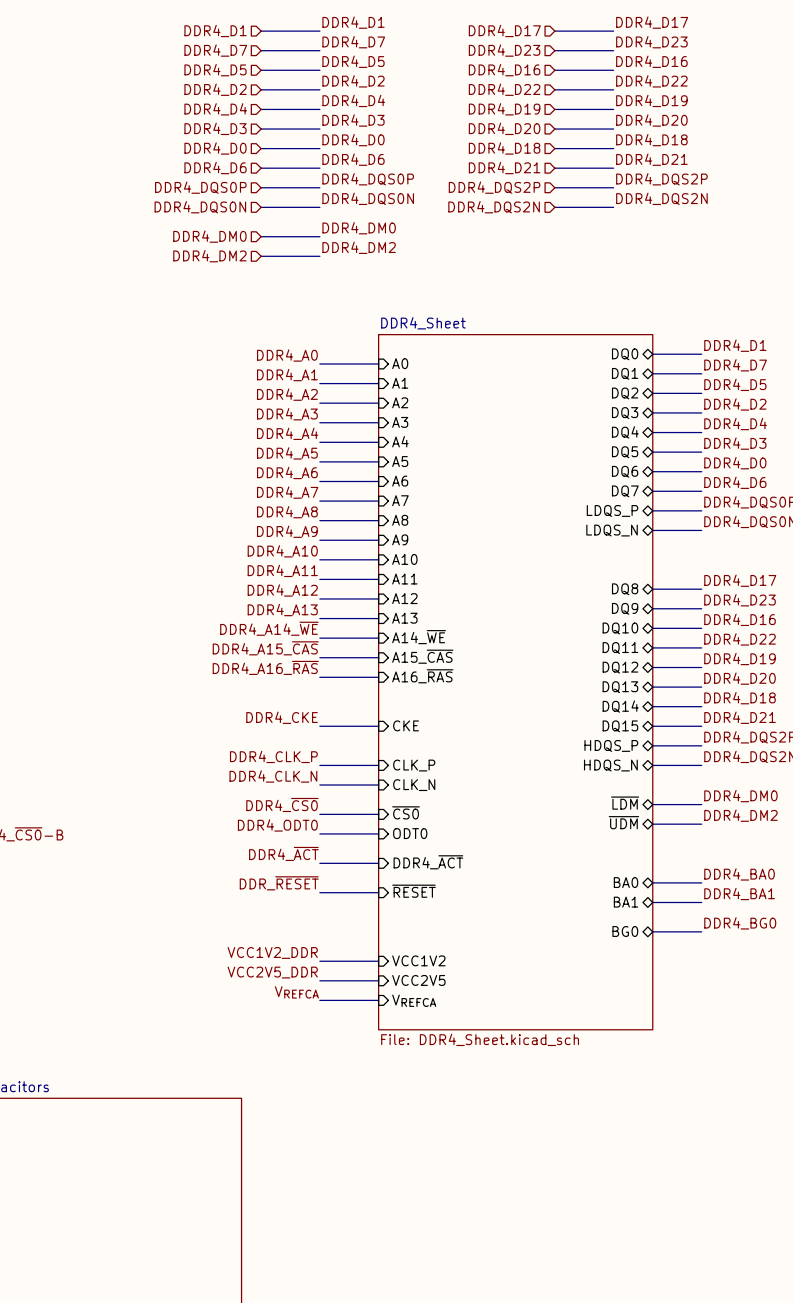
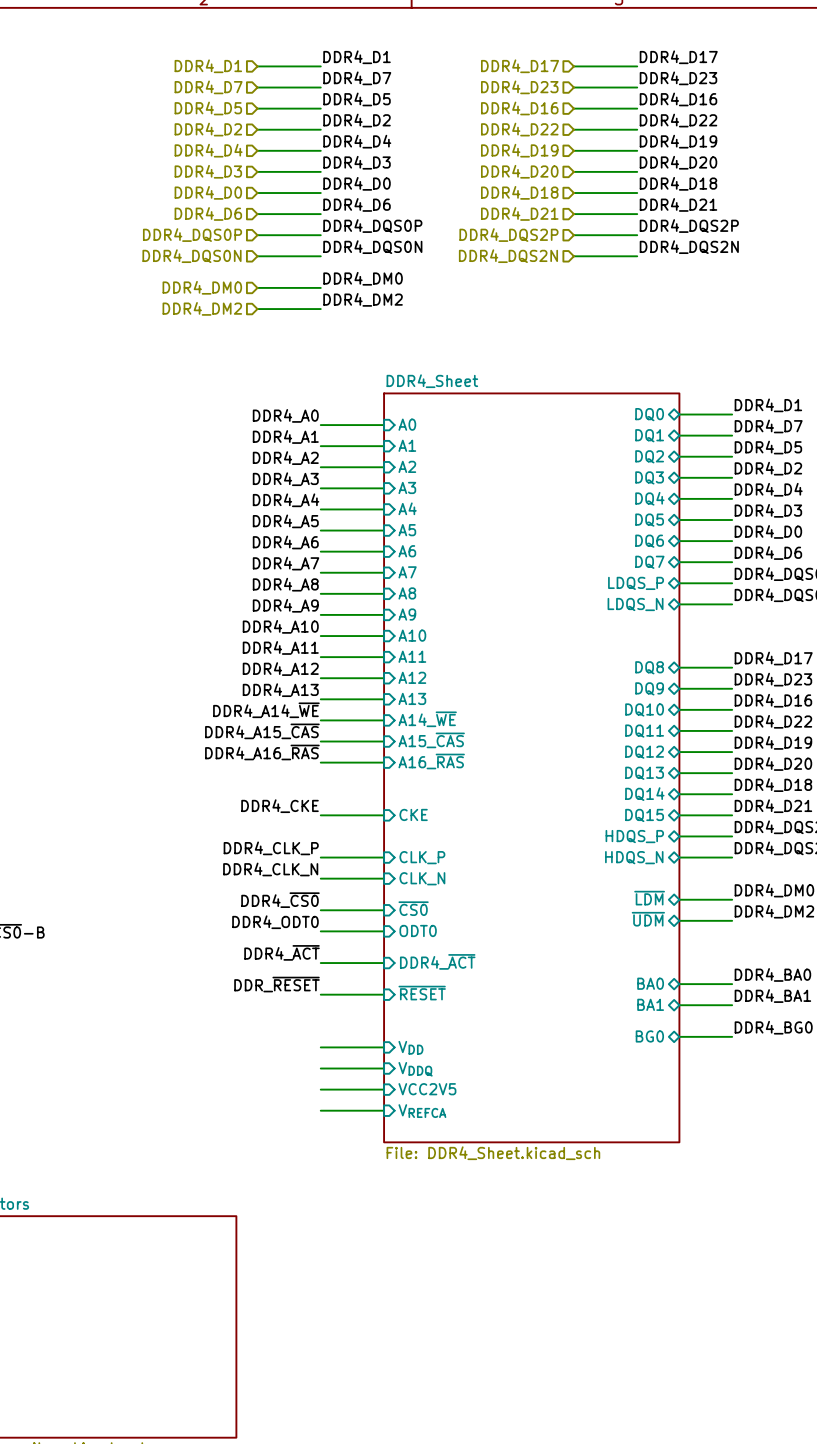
wire: none -> (320, 1047) (384, 1047)
sheet pin: none -> VDD (410, 1047)
label: VCC1V2_DDR (272, 952) -> none
sheet pin: VCC1V2 (418, 960) -> VDDQ (415, 1069)
label: VCC2V5_DDR (272, 972) -> none
label: VREFCA (296, 992) -> none

